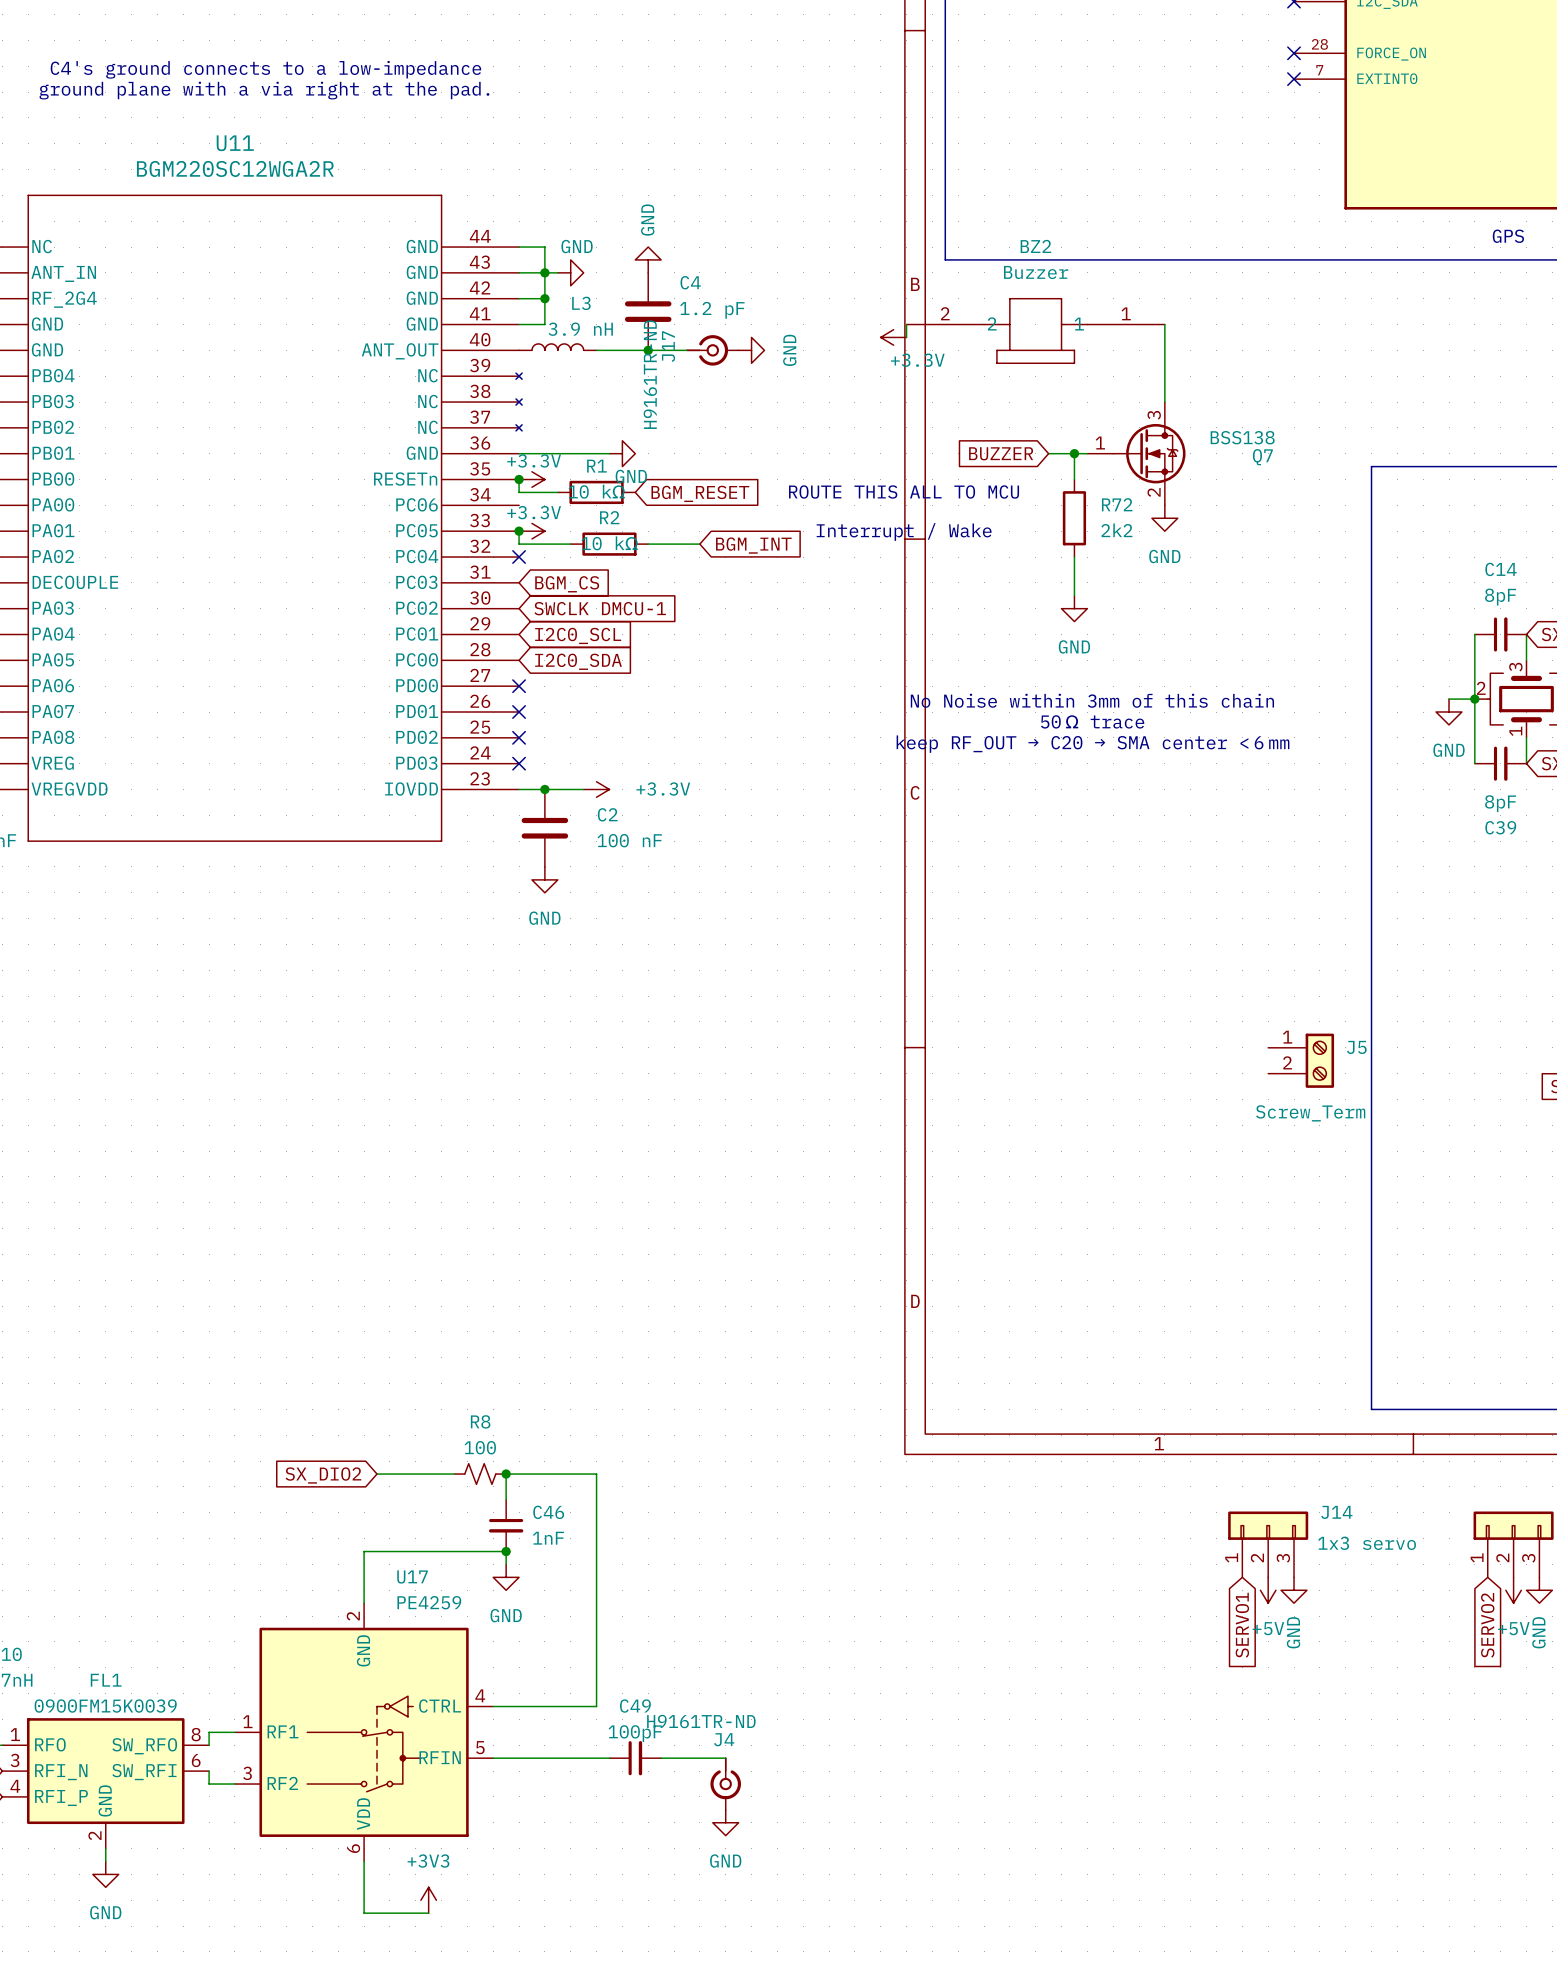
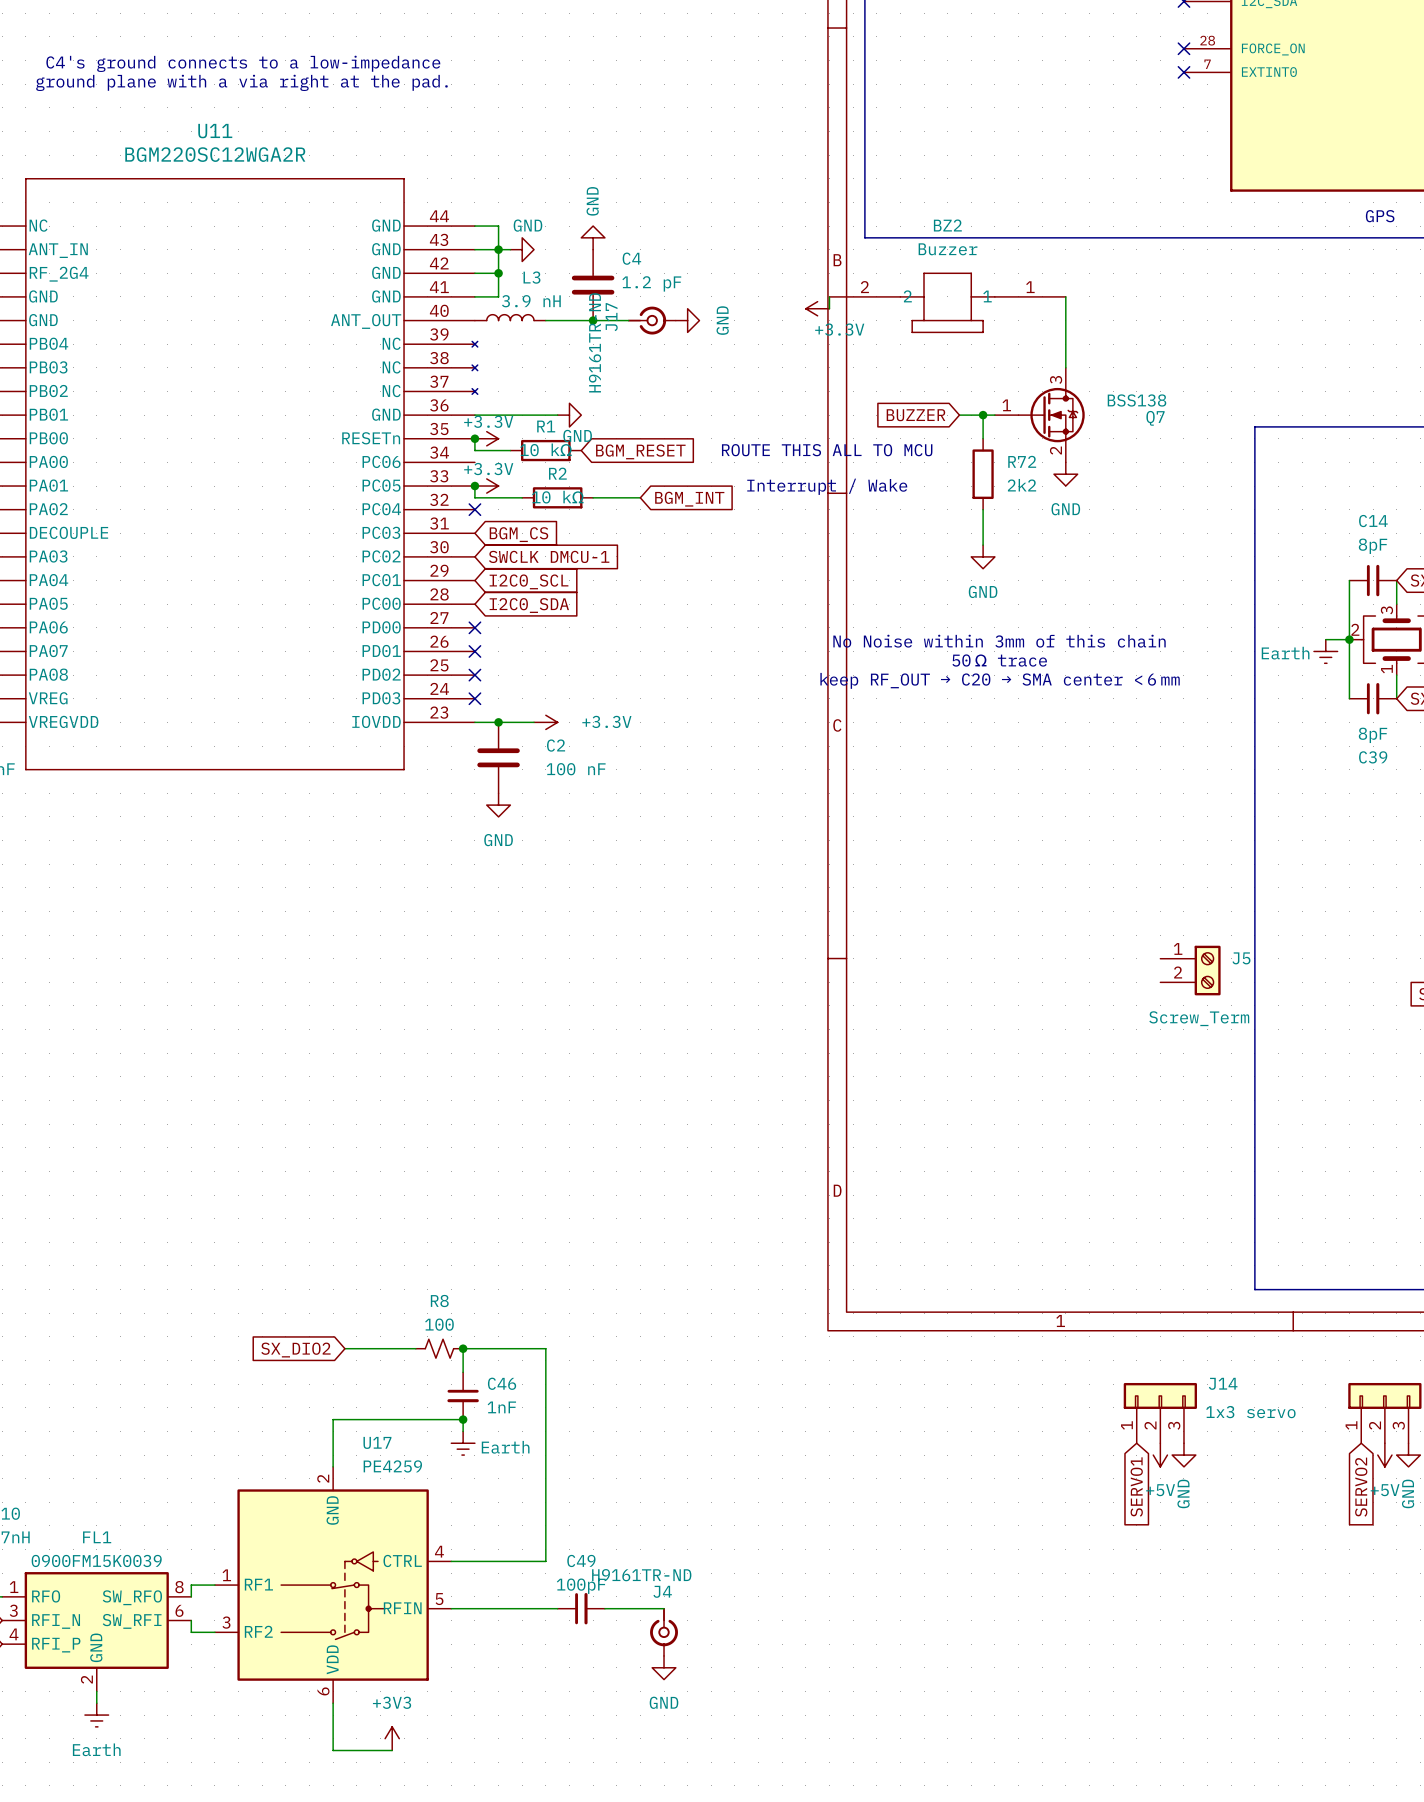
power symbol: GND (1449, 712) -> Earth (1325, 651)
power symbol: GND (506, 1577) -> Earth (463, 1443)
power symbol: GND (105, 1874) -> Earth (96, 1715)

